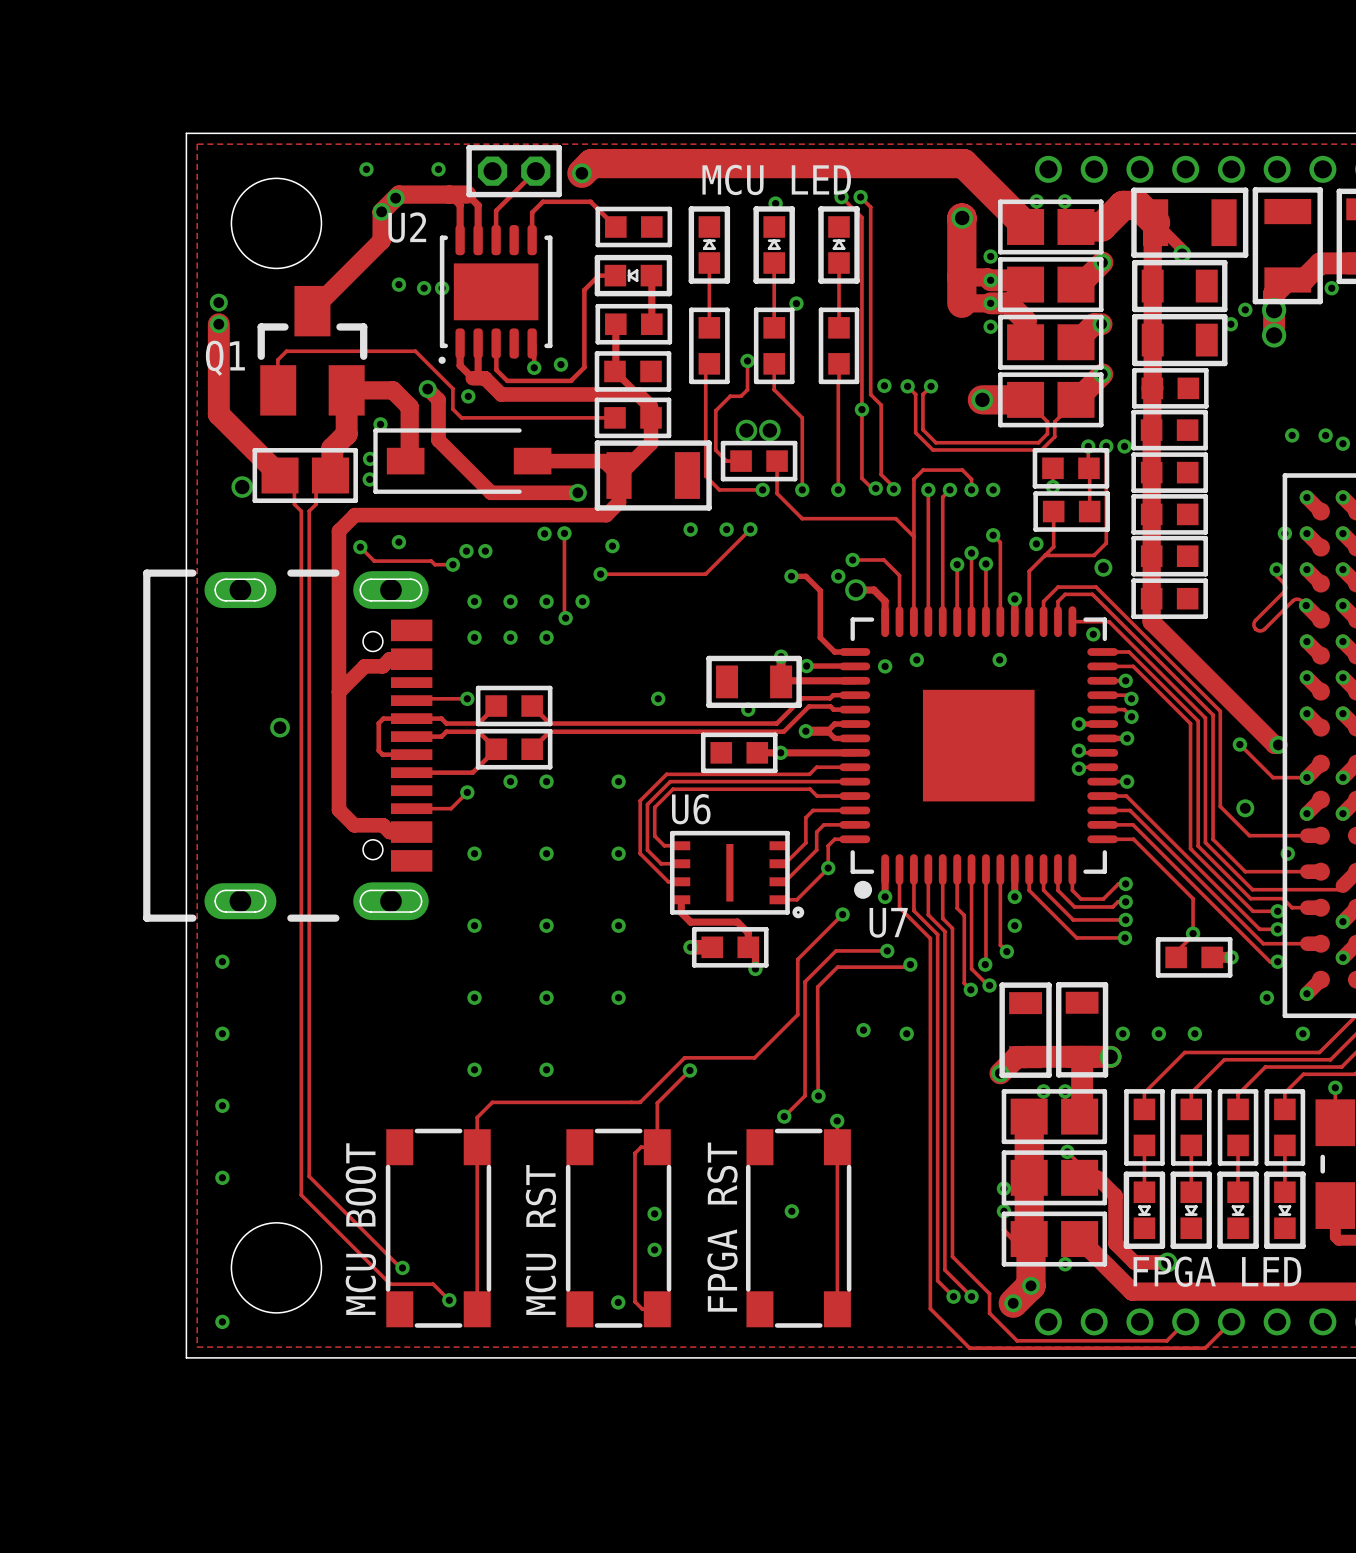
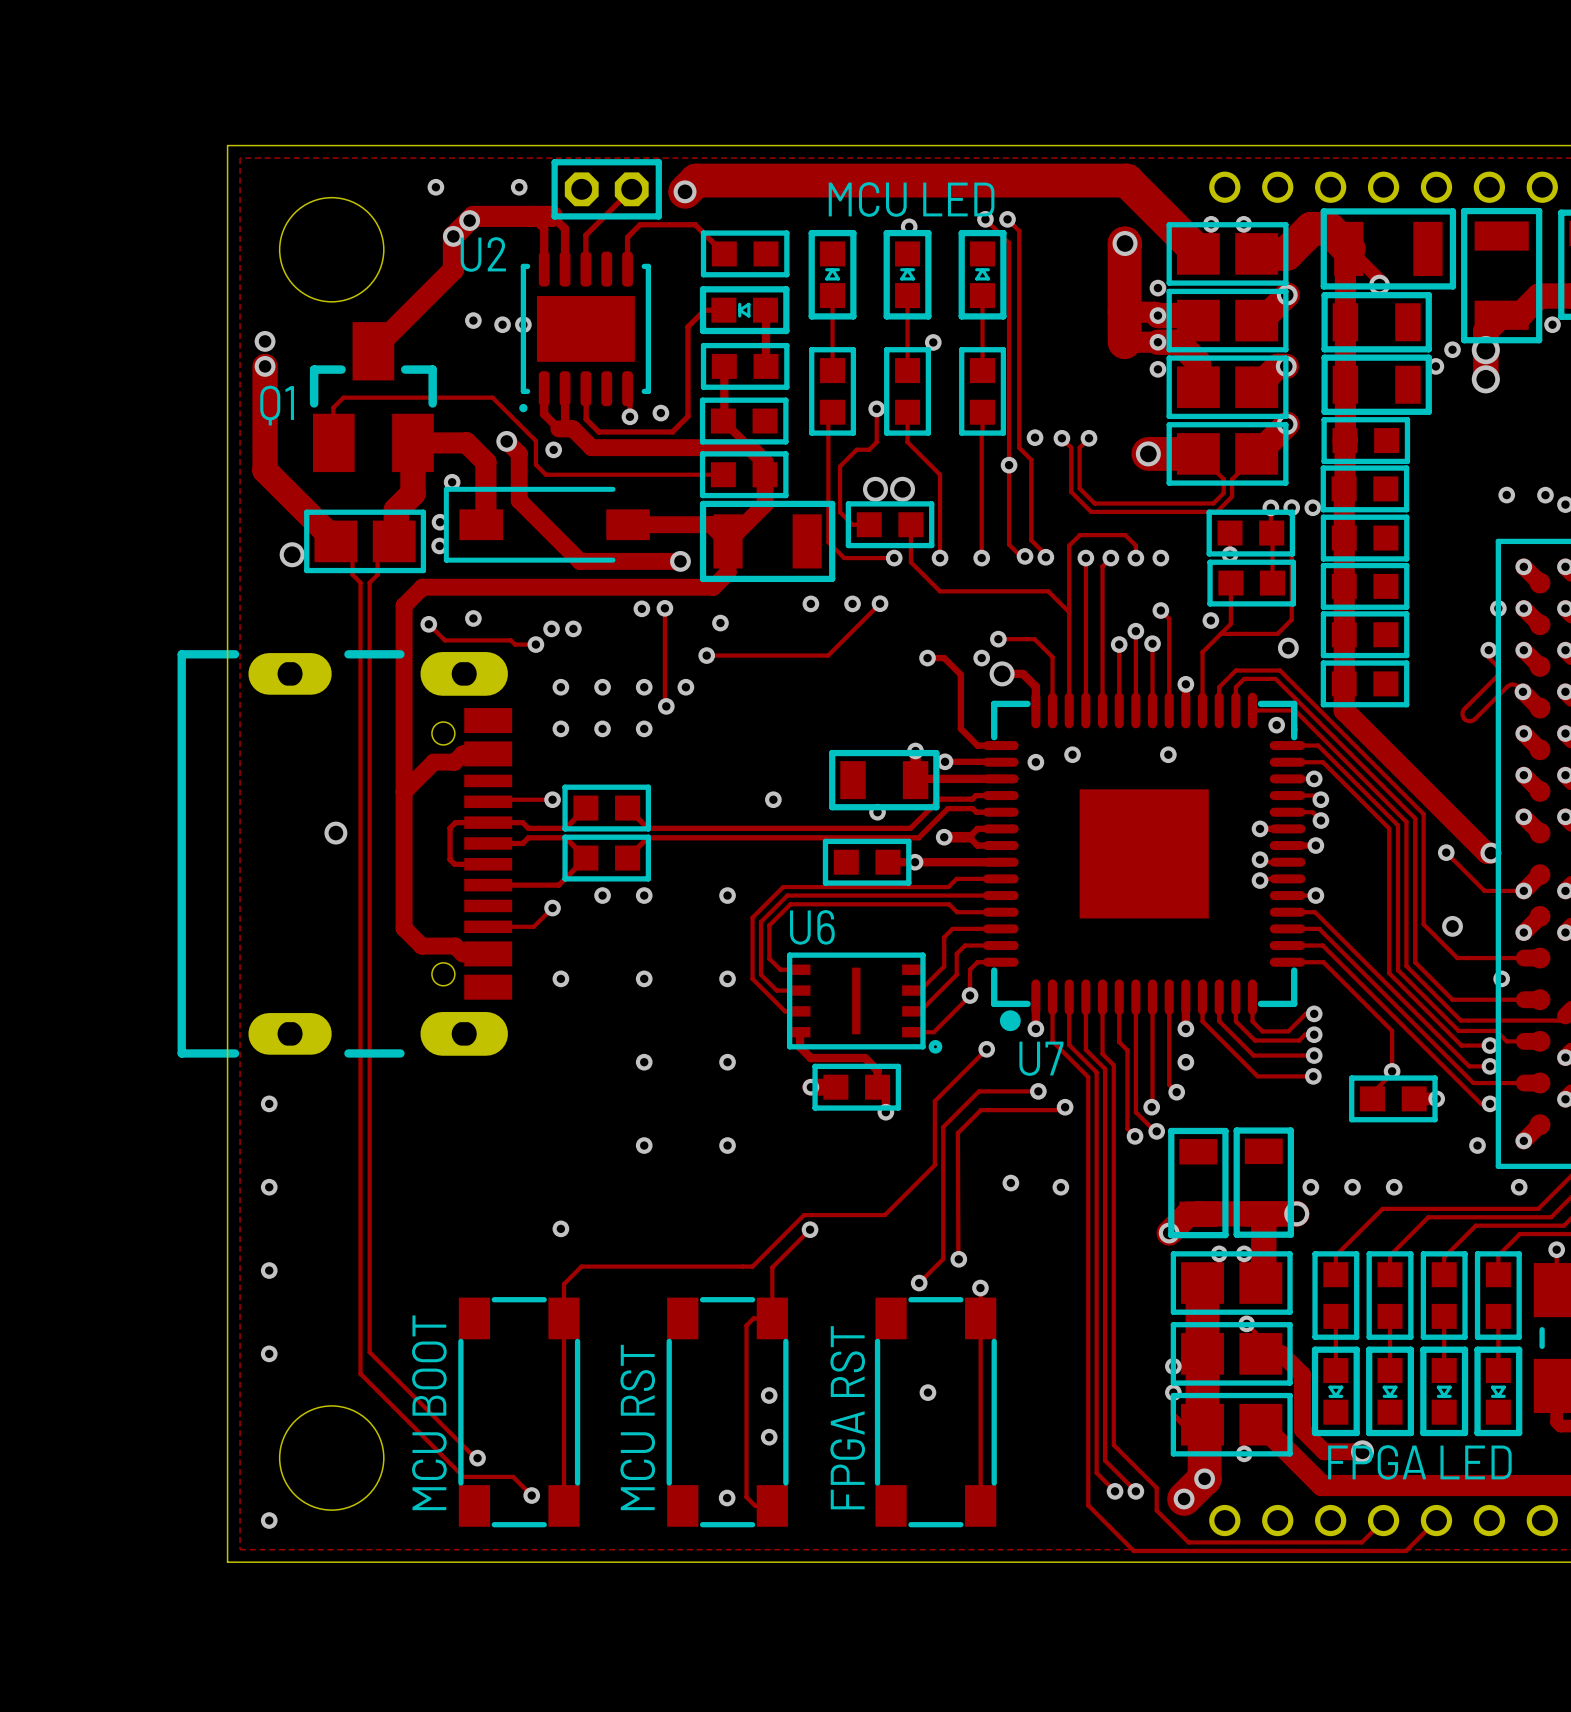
U7 footprint: [839, 606, 1119, 899] -> [982, 692, 1306, 1032]
via: (474, 925) -> none
via: (474, 997) -> none
via: (546, 1069) -> none

